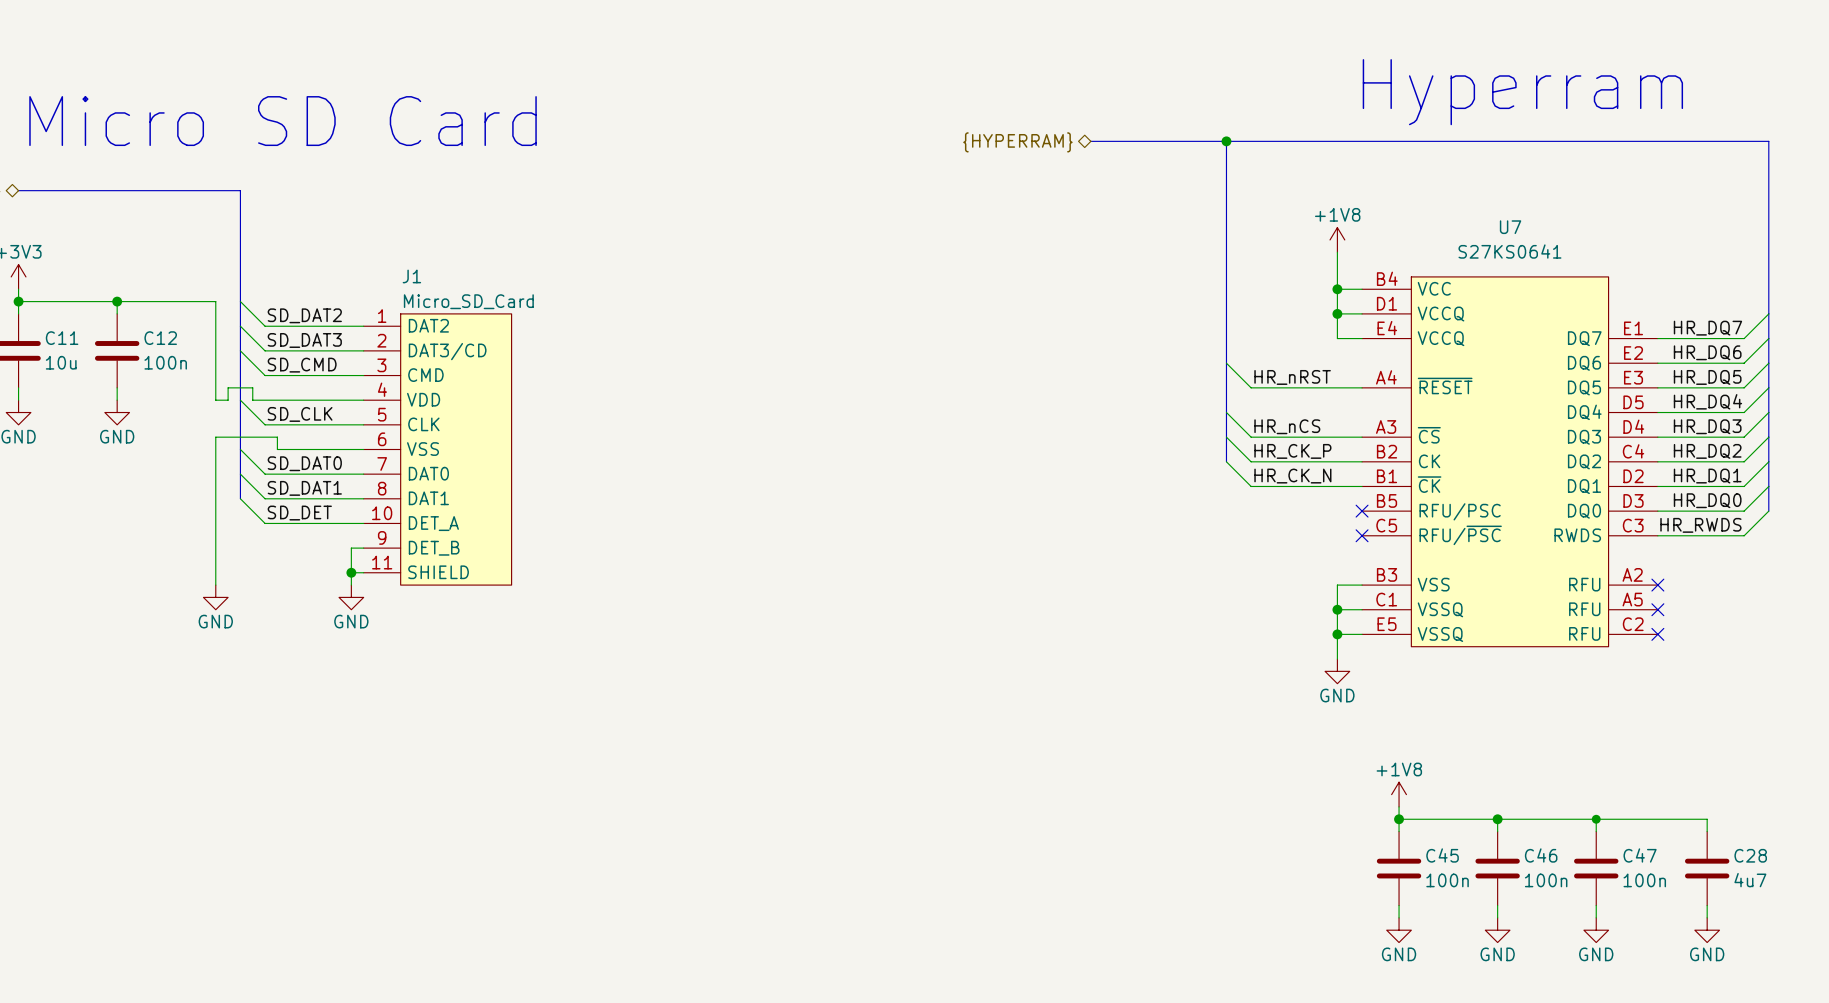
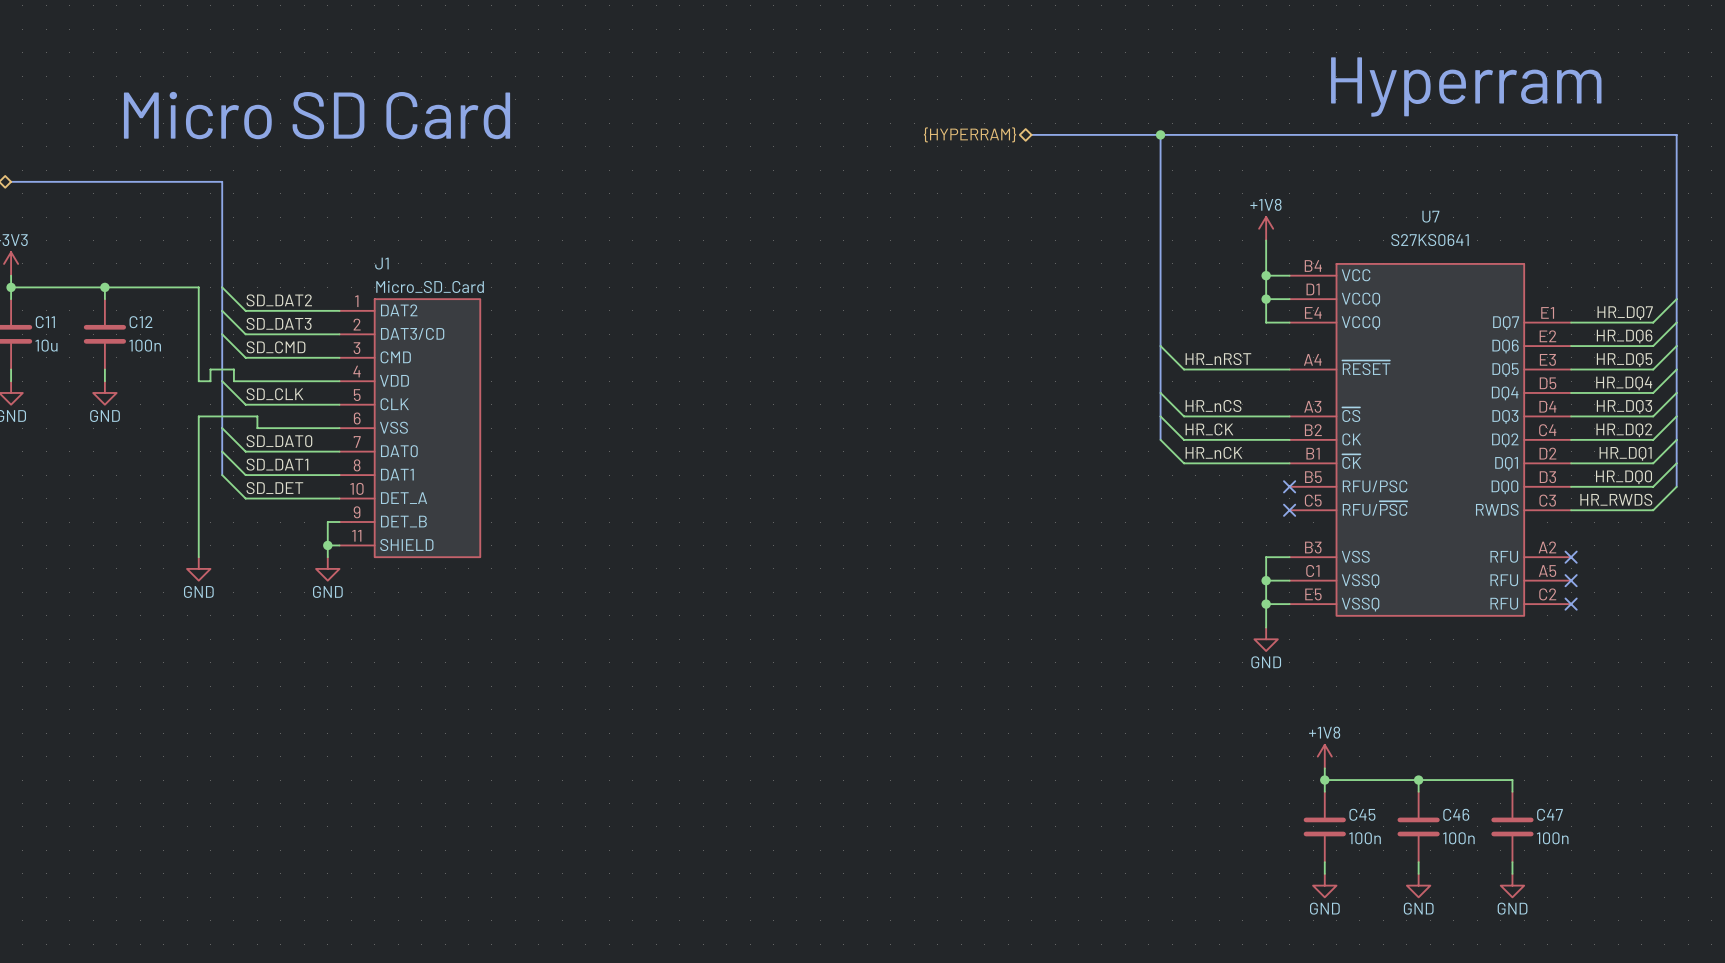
label: HR_CK_P (1292, 451) -> HR_CK (1209, 429)
label: HR_CK_N (1292, 476) -> HR_nCK (1213, 452)
wire: (1596, 819) (1707, 819) (1707, 831) -> none
junction: (1596, 819) -> none
C28: 4u7 (1707, 868) -> none
wire: (1707, 905) (1707, 917) -> none
power symbol: GND (1707, 930) -> none

